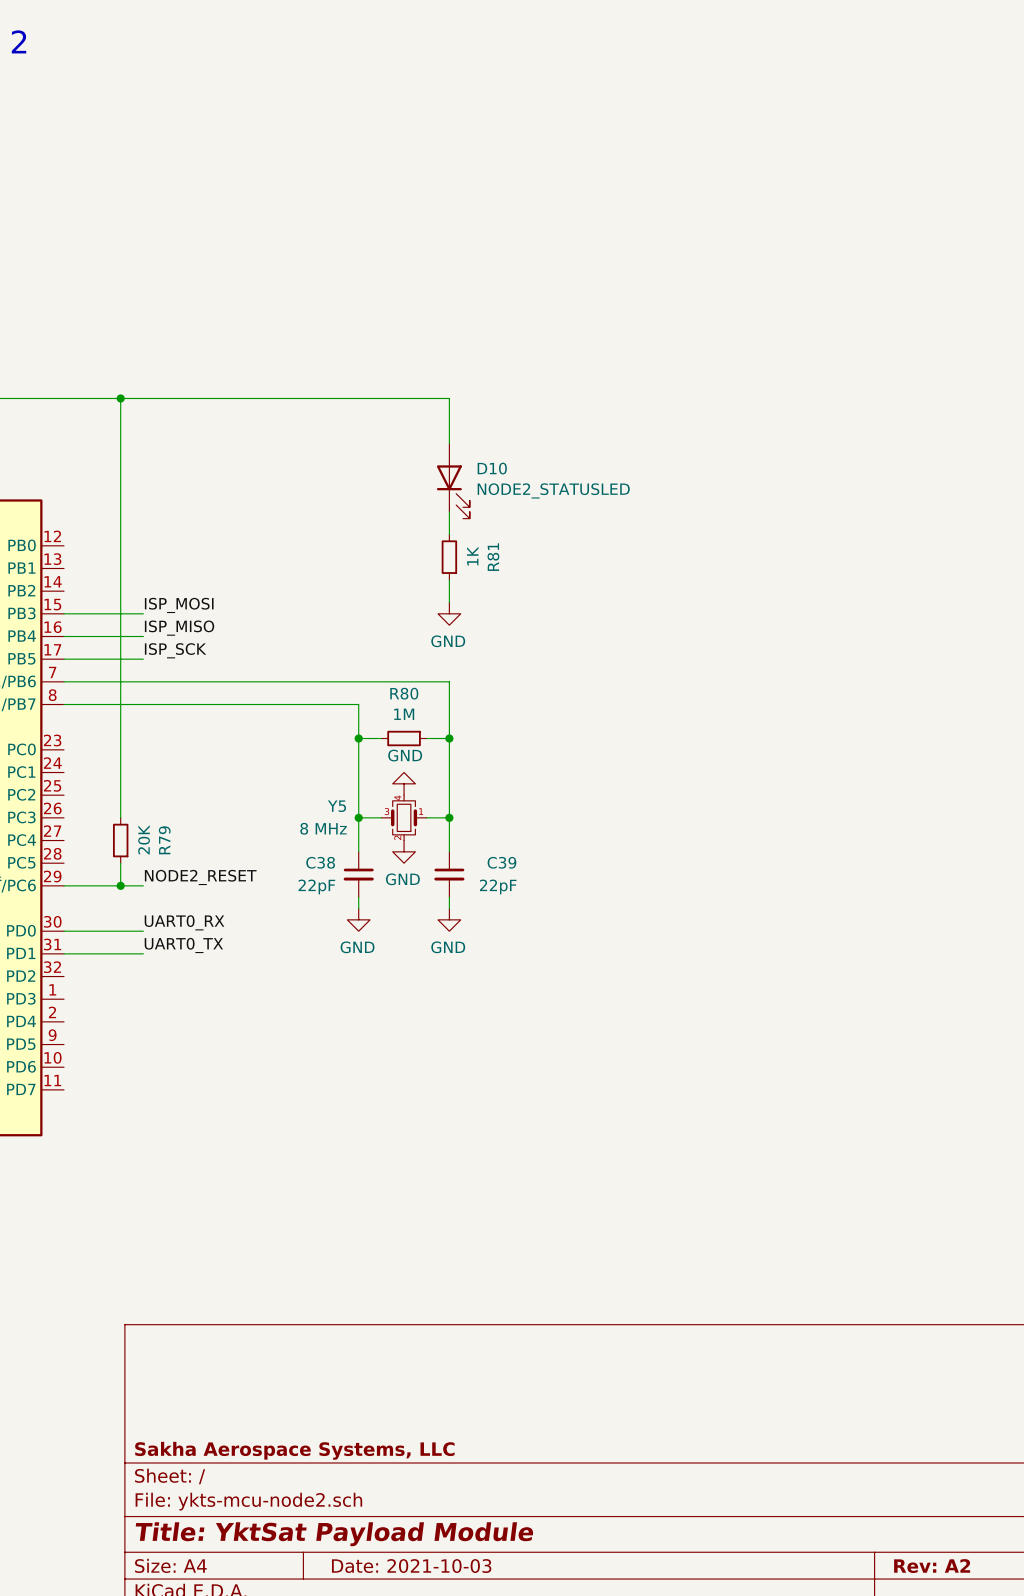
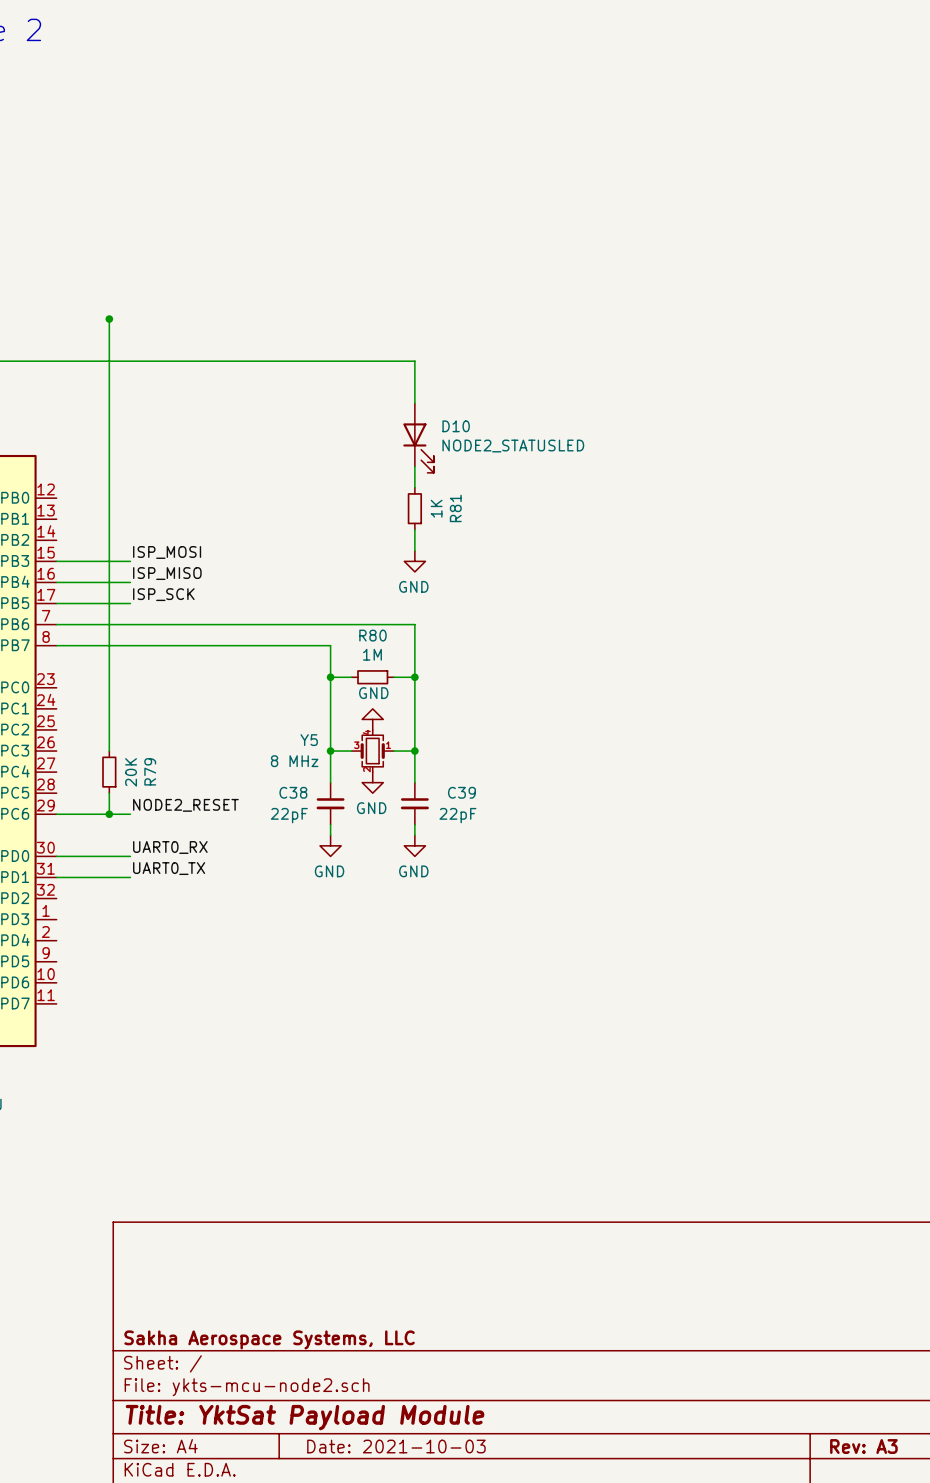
wire: none -> (109, 319) (109, 361)
junction position: (120, 398) -> (109, 319)
title block: Rev: A2 (932, 1566) -> Rev: A3 (863, 1446)

